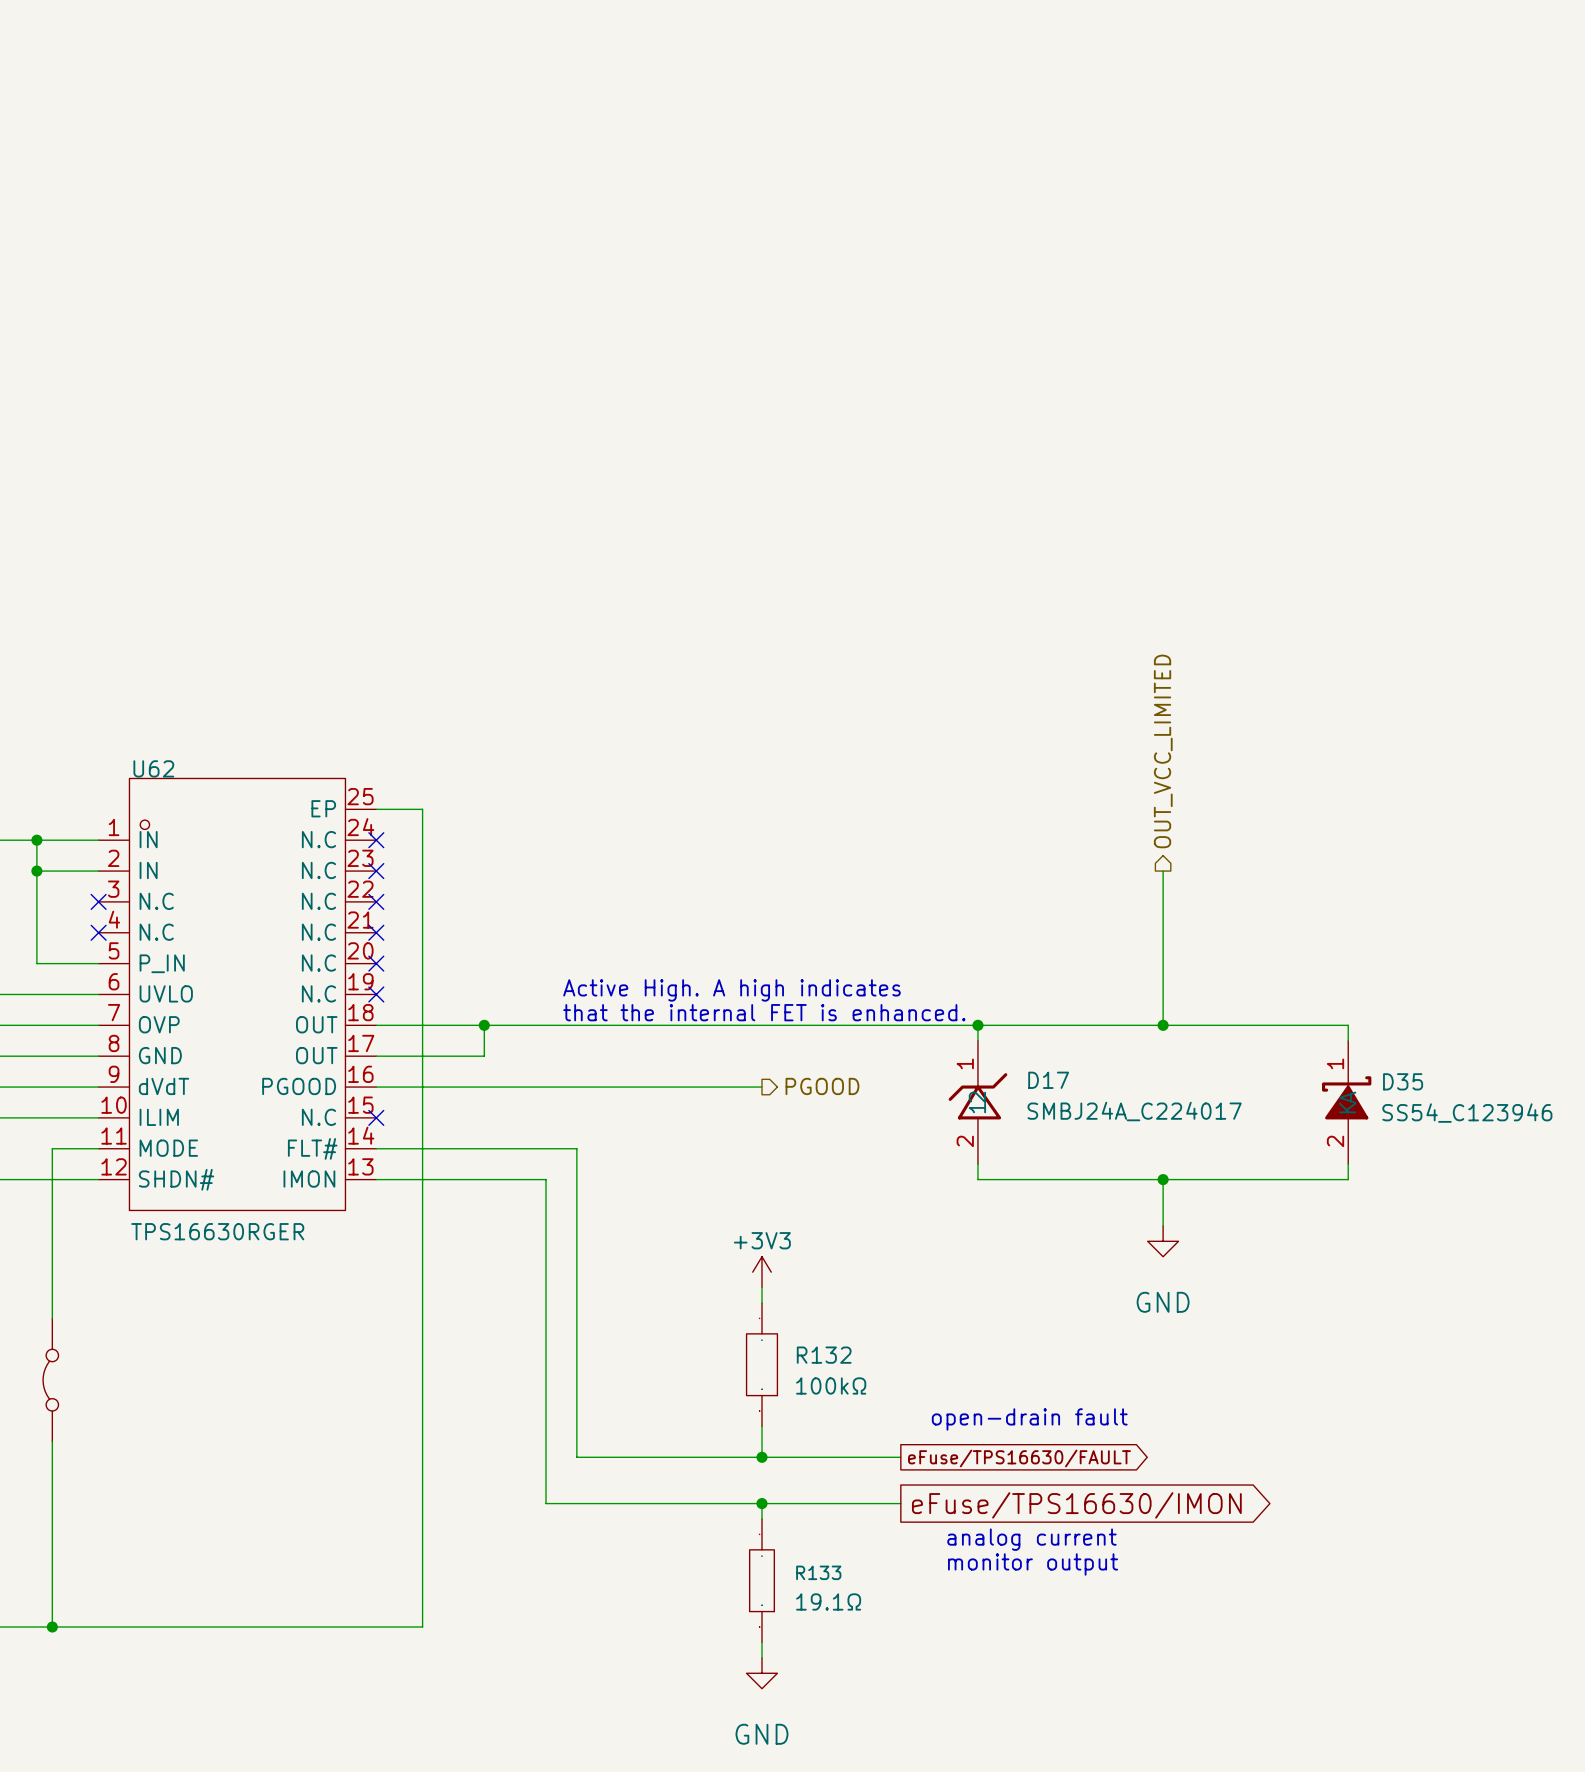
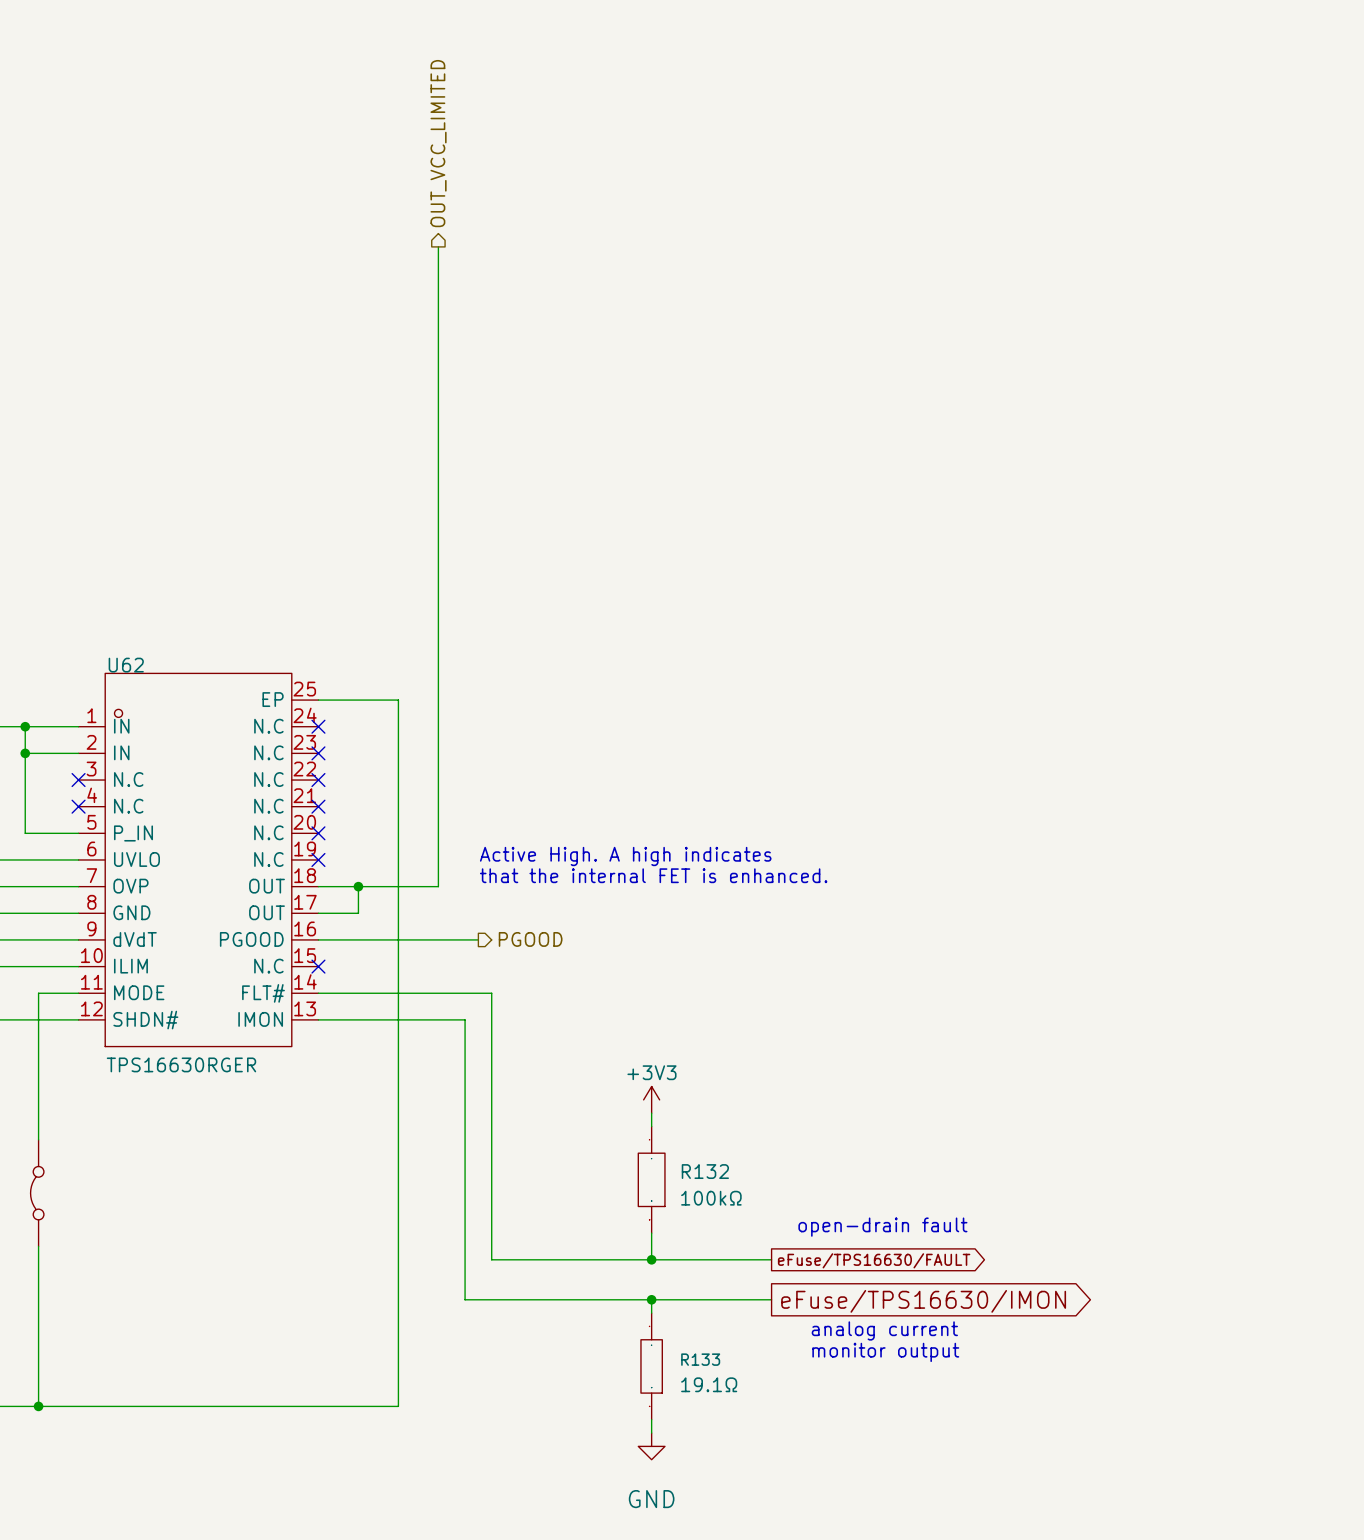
hierarchical label: none -> OUT_VCC_LIMITED (438, 143)
hierarchical label: OUT_VCC_LIMITED (1163, 751) -> none
wire: (422, 809) (422, 1025) -> none
wire: (1163, 871) (1163, 1025) -> none
wire: (484, 1025) (484, 1056) (422, 1056) (422, 1627) -> (358, 700) (398, 700) (398, 1406) (358, 1406)
junction position: (484, 1025) -> (358, 886)
wire: (515, 1025) (1348, 1025) (1348, 1040) -> (438, 886) (438, 246)
wire: (977, 1025) (977, 1040) -> none
junction: (977, 1025) -> none
junction: (1163, 1025) -> none
hierarchical label position: PGOOD (822, 1086) -> PGOOD (530, 939)
wire: (561, 1087) (761, 1087) -> none
D17: SMBJ24A_C224017 (977, 1102) -> none
D35: SS54_C123946 (1346, 1102) -> none
wire: (977, 1164) (977, 1179) (1348, 1179) (1348, 1164) -> none
wire: (1163, 1179) (1163, 1225) -> none
junction: (1163, 1179) -> none
power symbol: GND (1163, 1241) -> none

